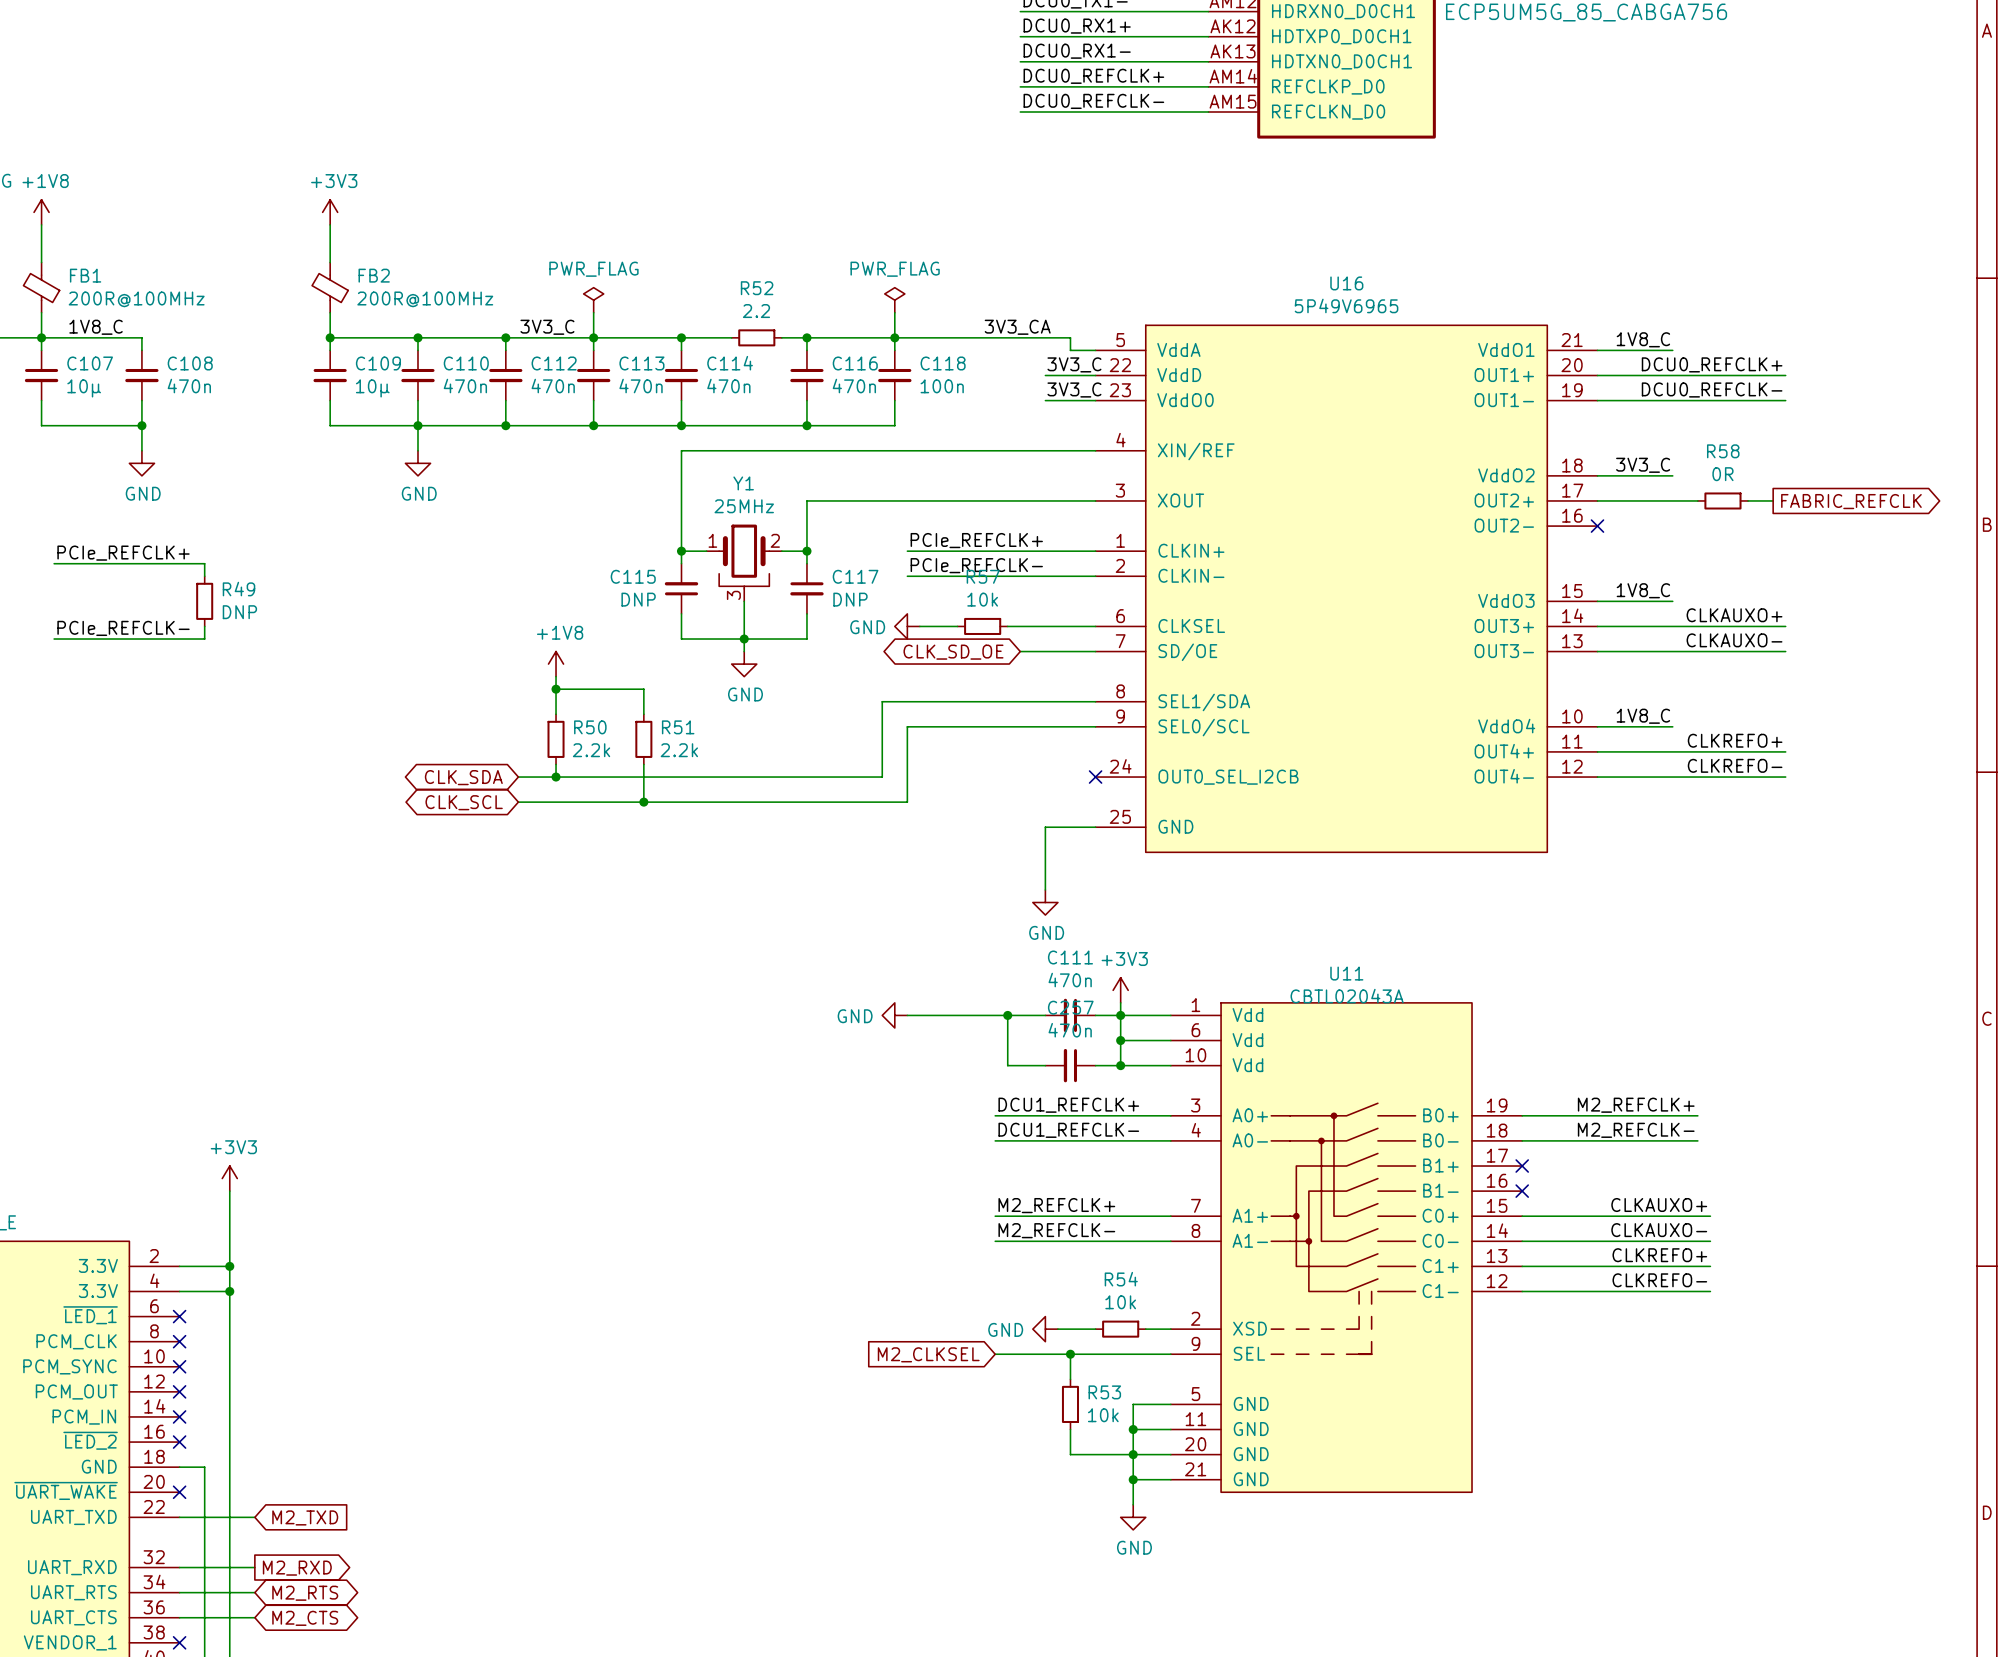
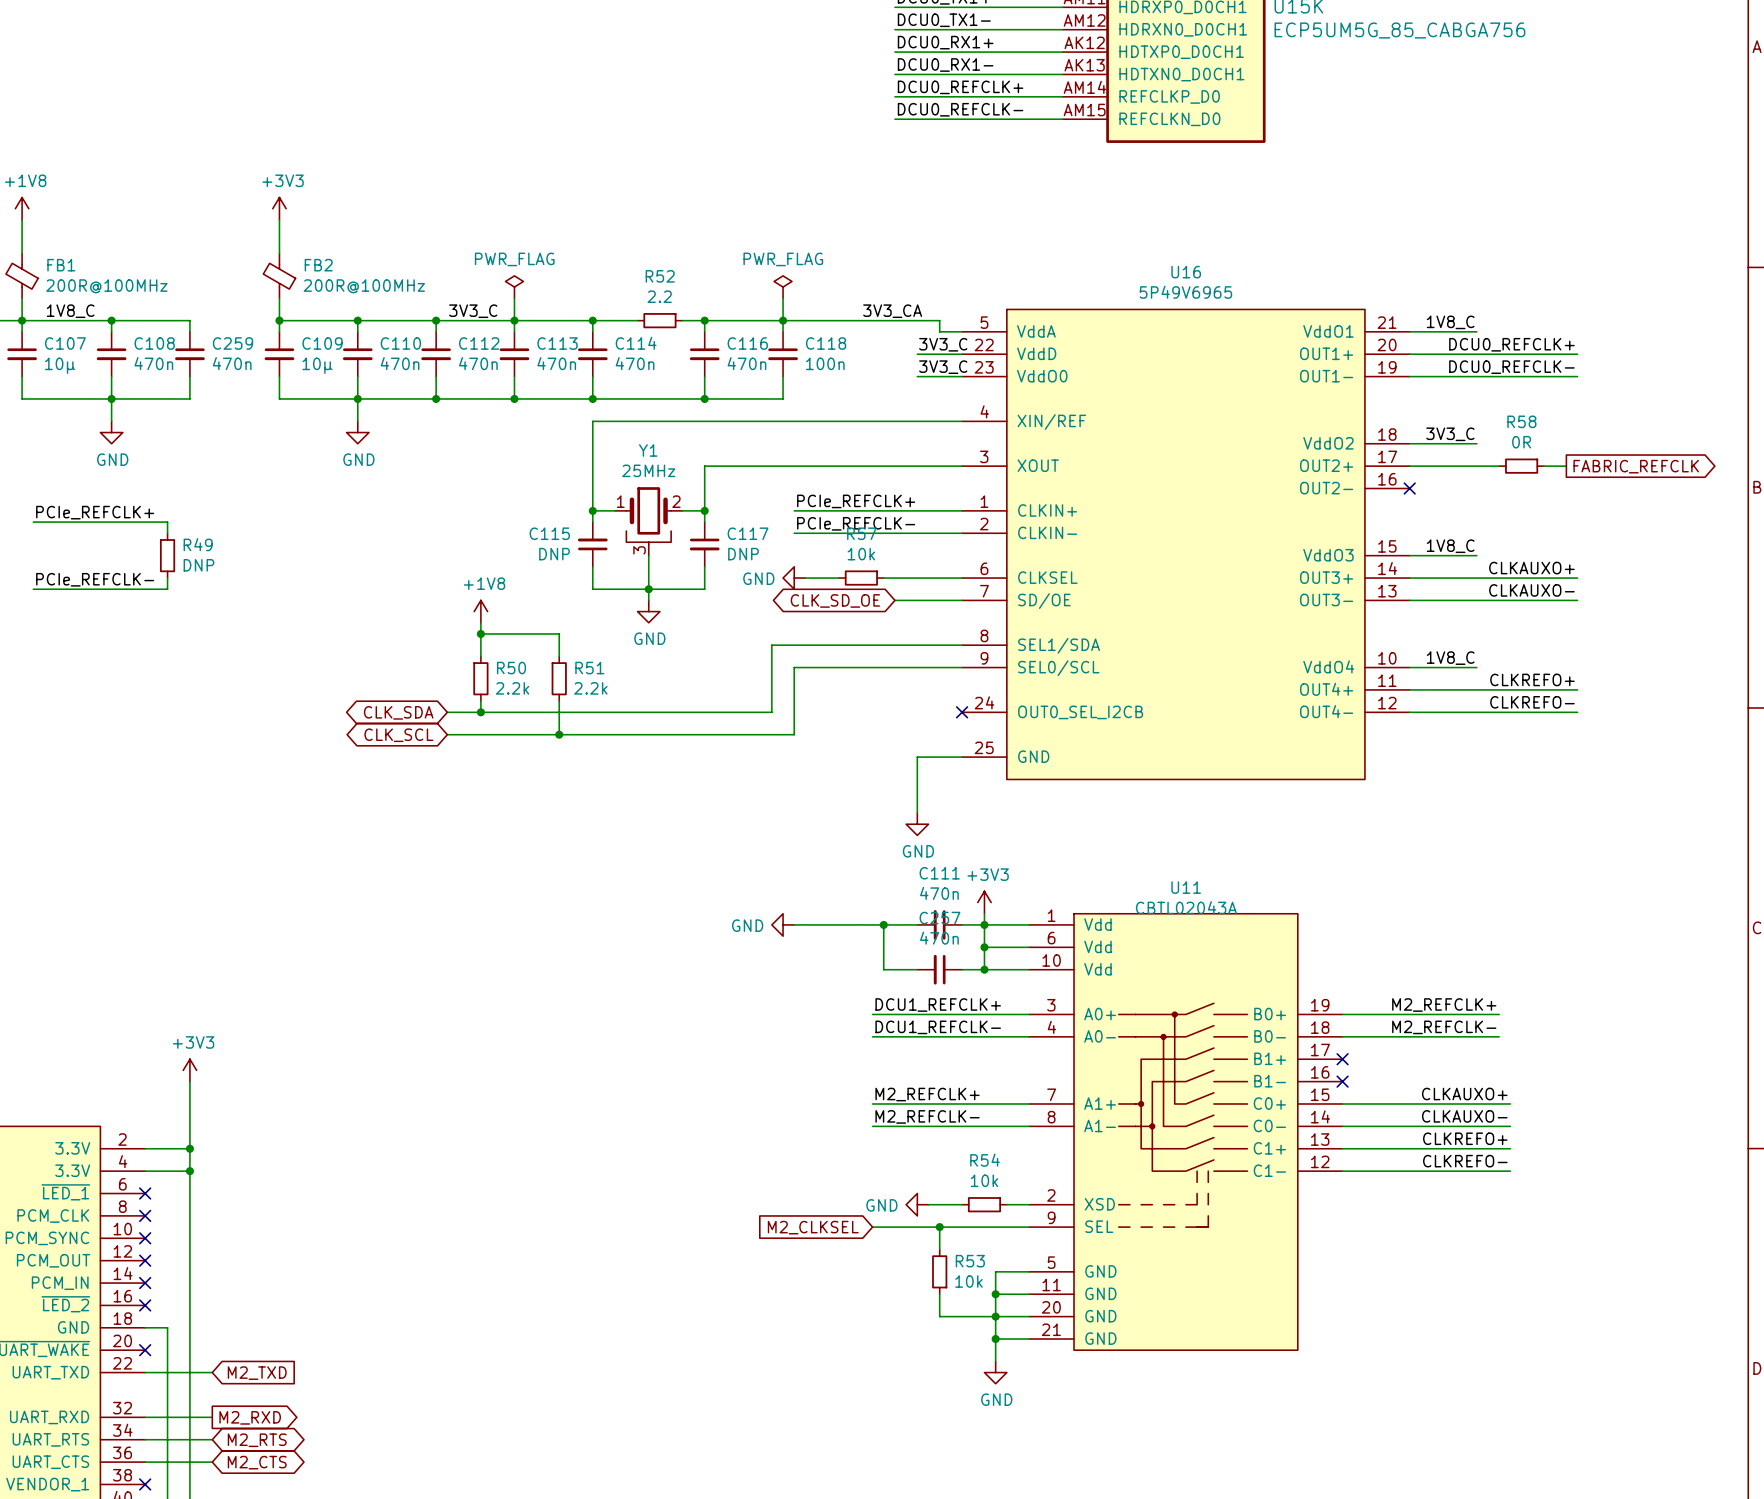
wire: none -> (111, 320) (189, 320) (189, 331)
junction: none -> (111, 320)
C259: none -> 470n (189, 354)
wire: none -> (189, 376) (189, 398) (111, 398)

